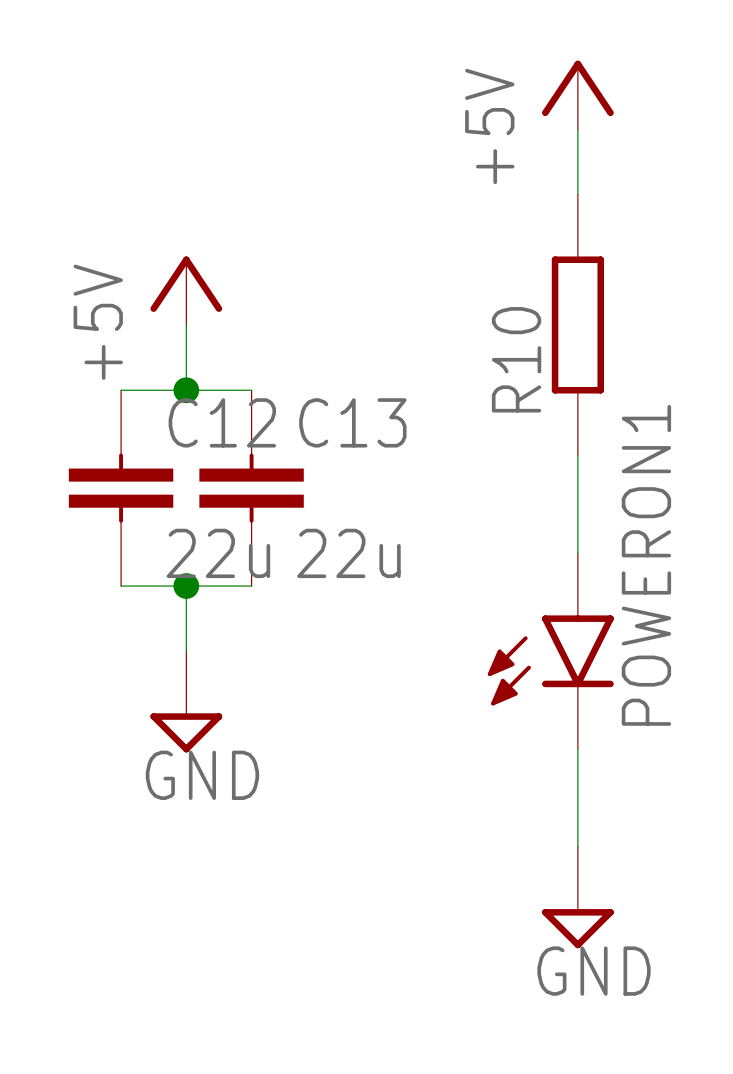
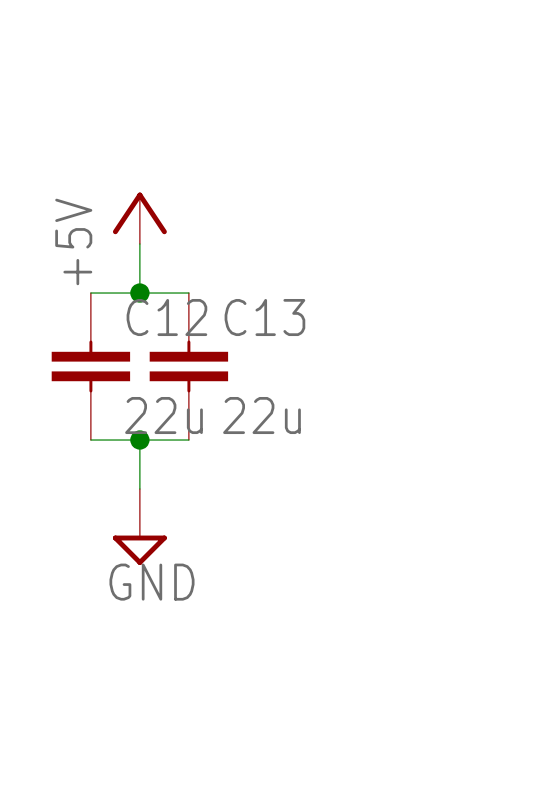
power symbol: +5V (577, 94) -> none
wire: (577, 129) (577, 194) -> none
R10: (577, 324) -> none
wire: (577, 455) (577, 553) -> none
POWERON1: (550, 651) -> none
wire: (577, 749) (577, 847) -> none
power symbol: GND (577, 897) -> none

